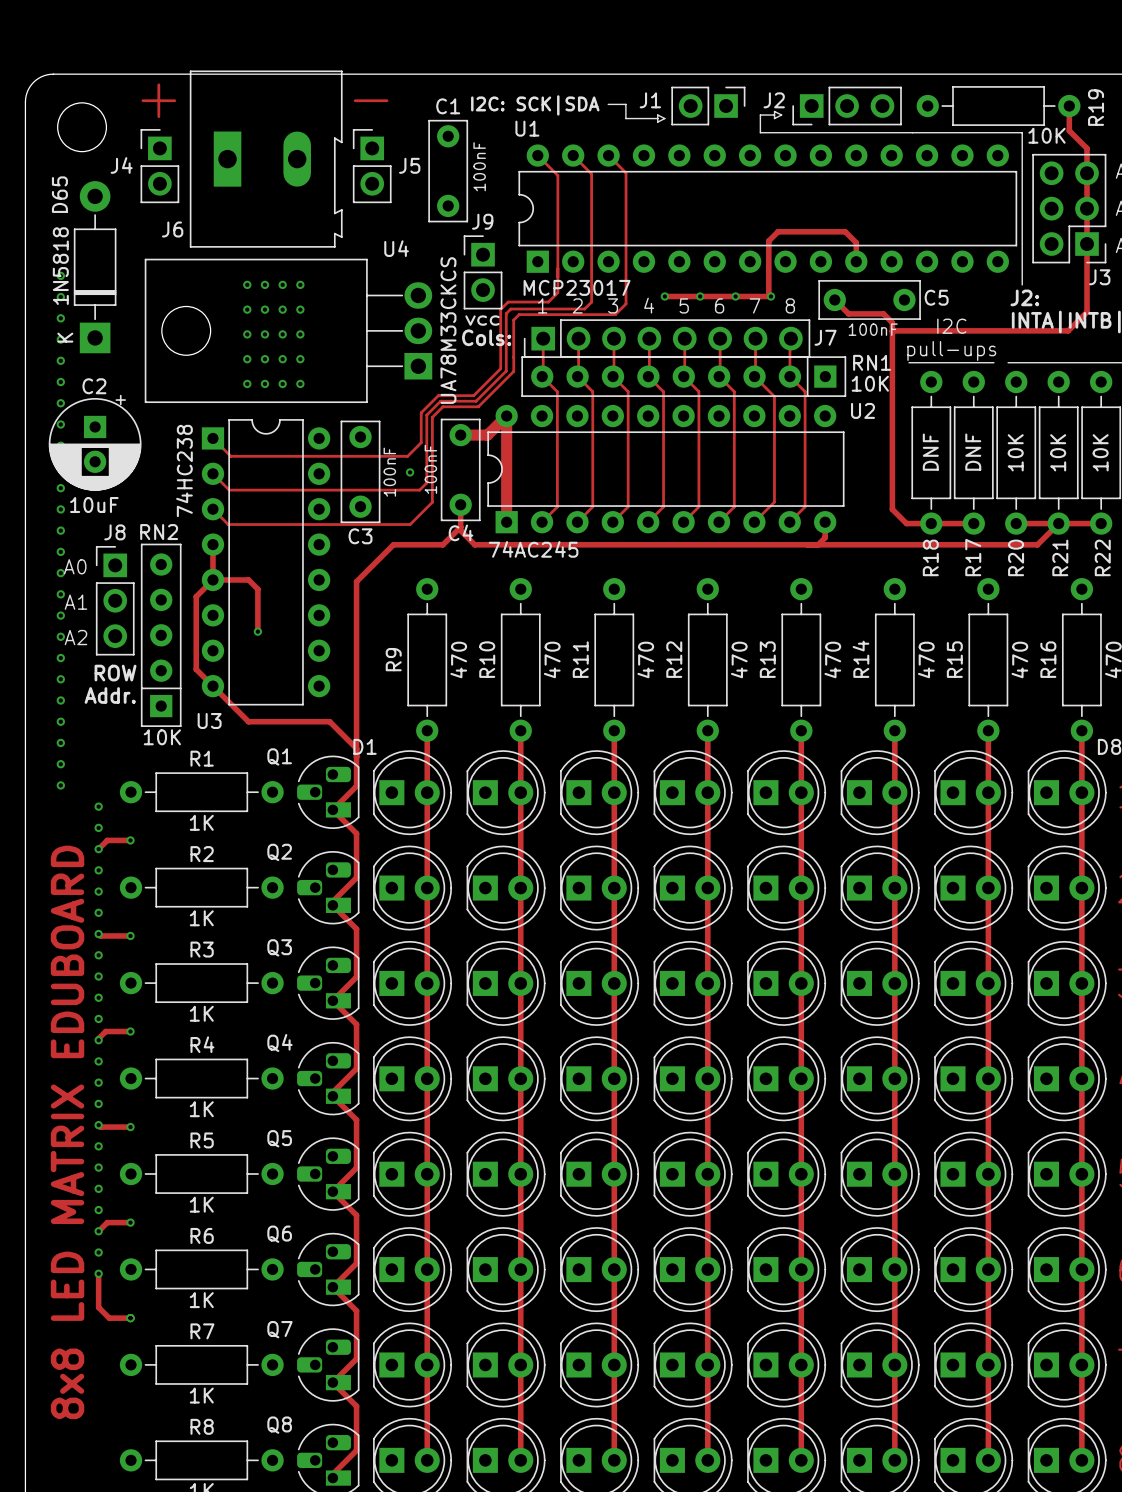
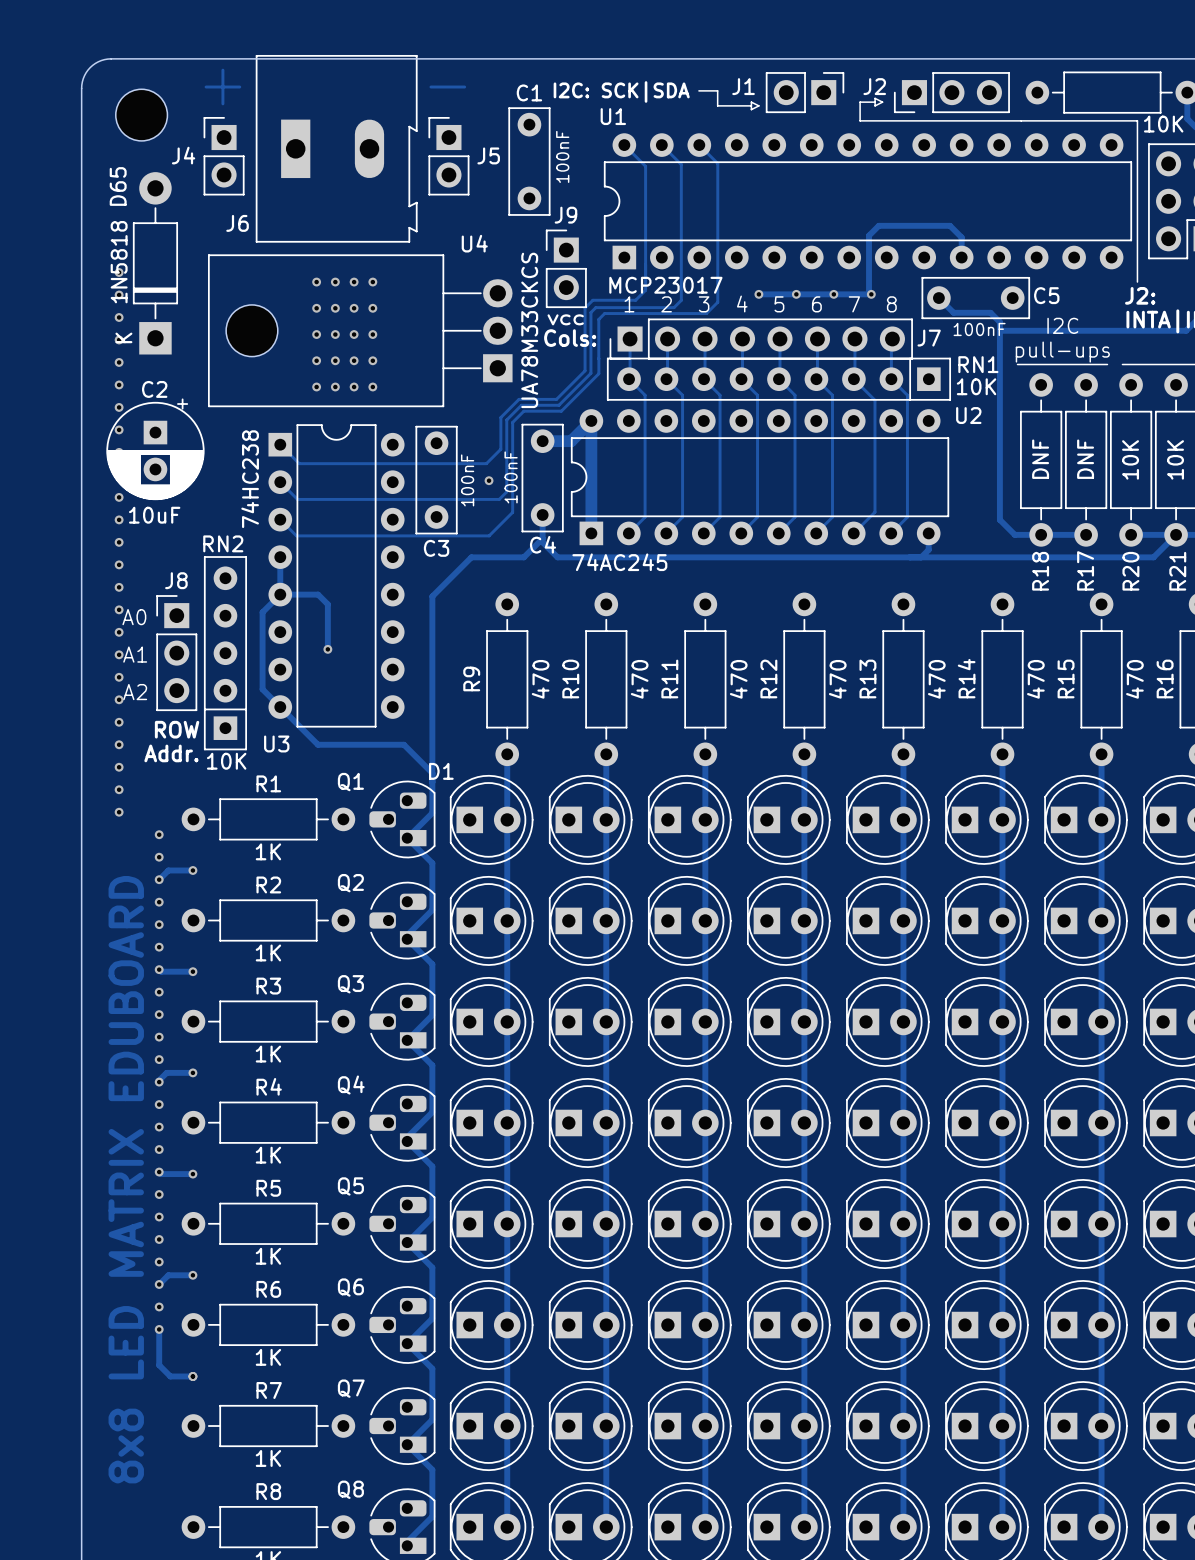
text: A0 (75, 566) -> none
J8 position: (115, 600) -> (176, 653)
text: A1 (75, 602) -> A0 (134, 617)
text: A2 (75, 637) -> A1 (135, 654)
text: none -> A2 (135, 692)
text: ROW (115, 673) -> none
text: Addr. (110, 695) -> ROW (177, 729)
text: none -> Addr. (171, 753)

